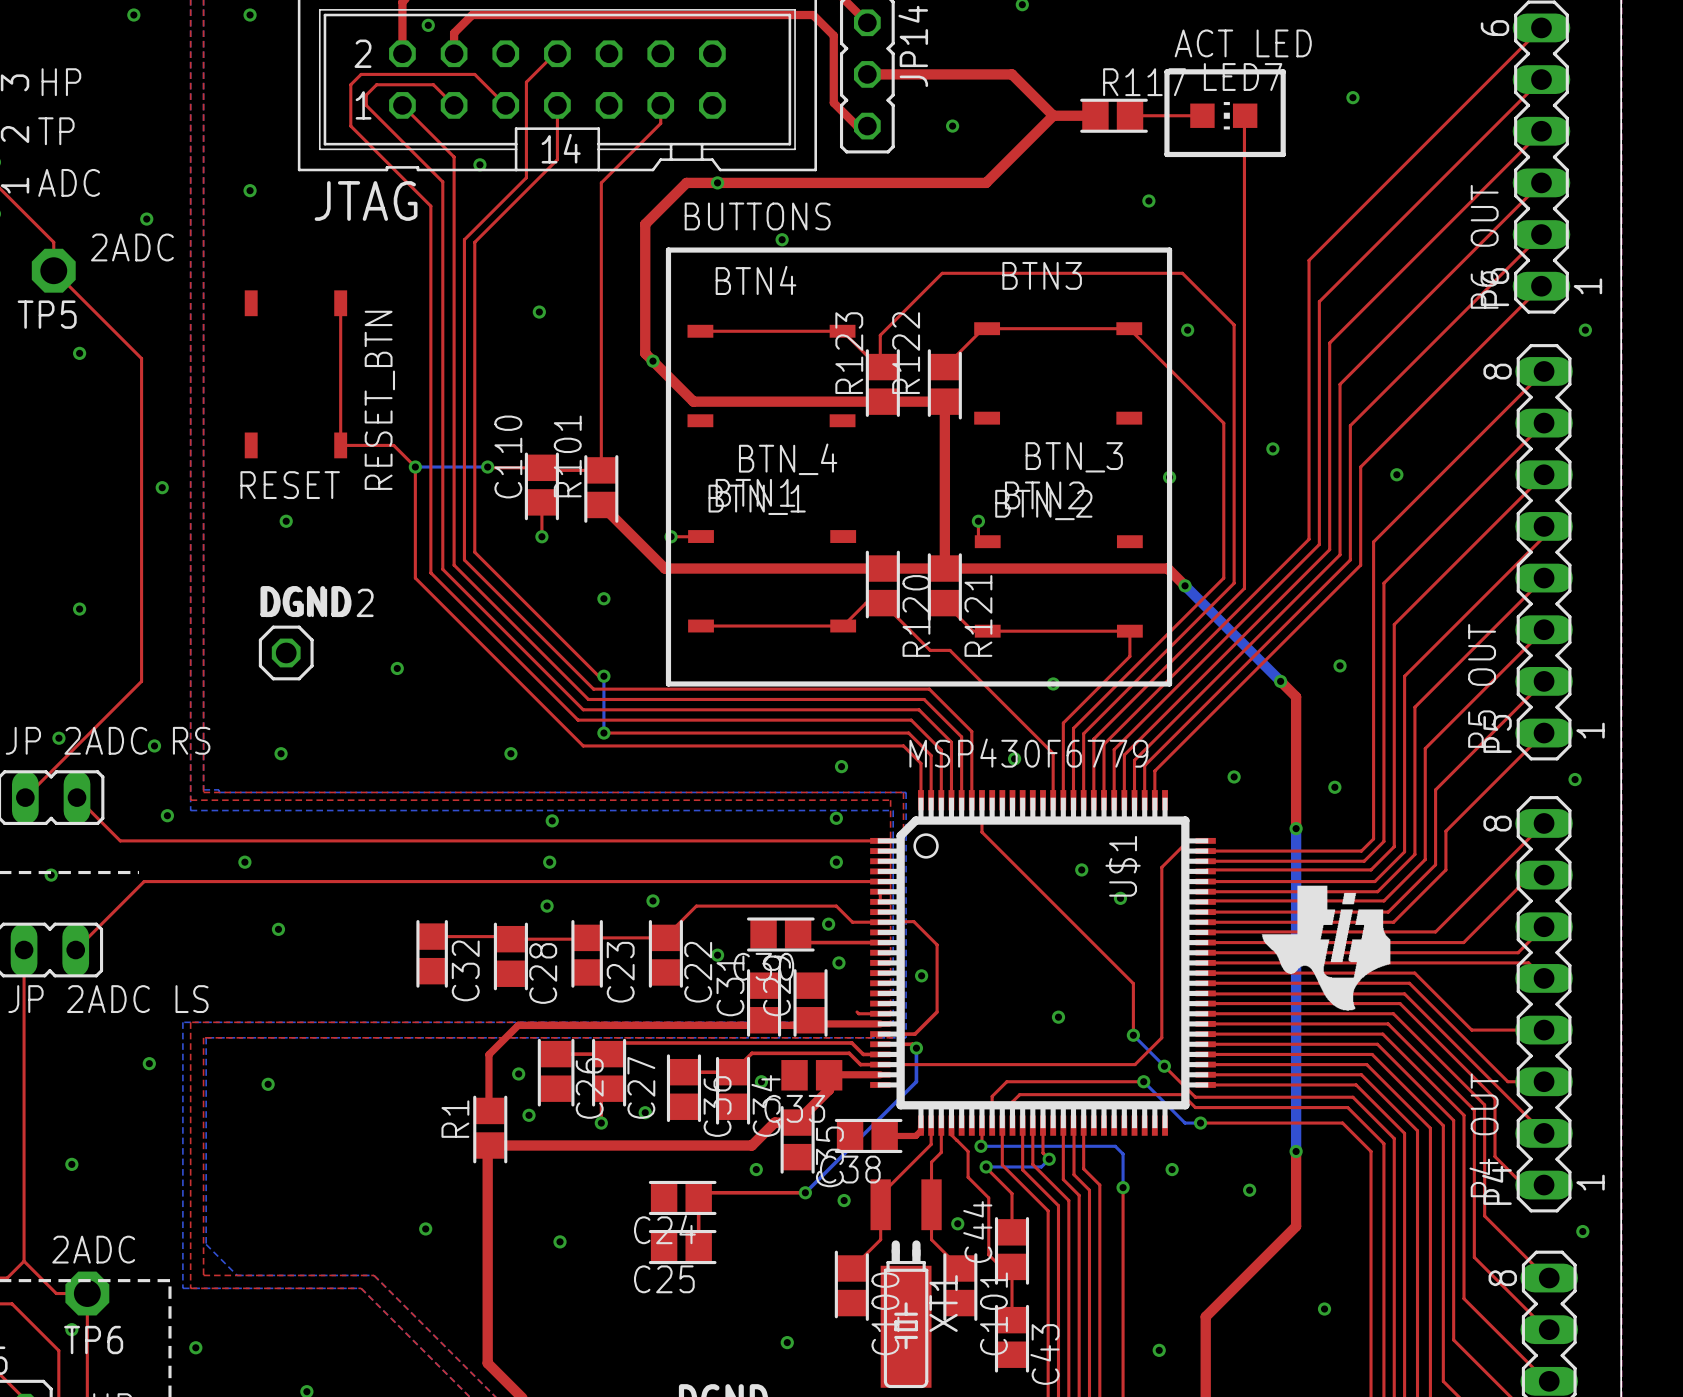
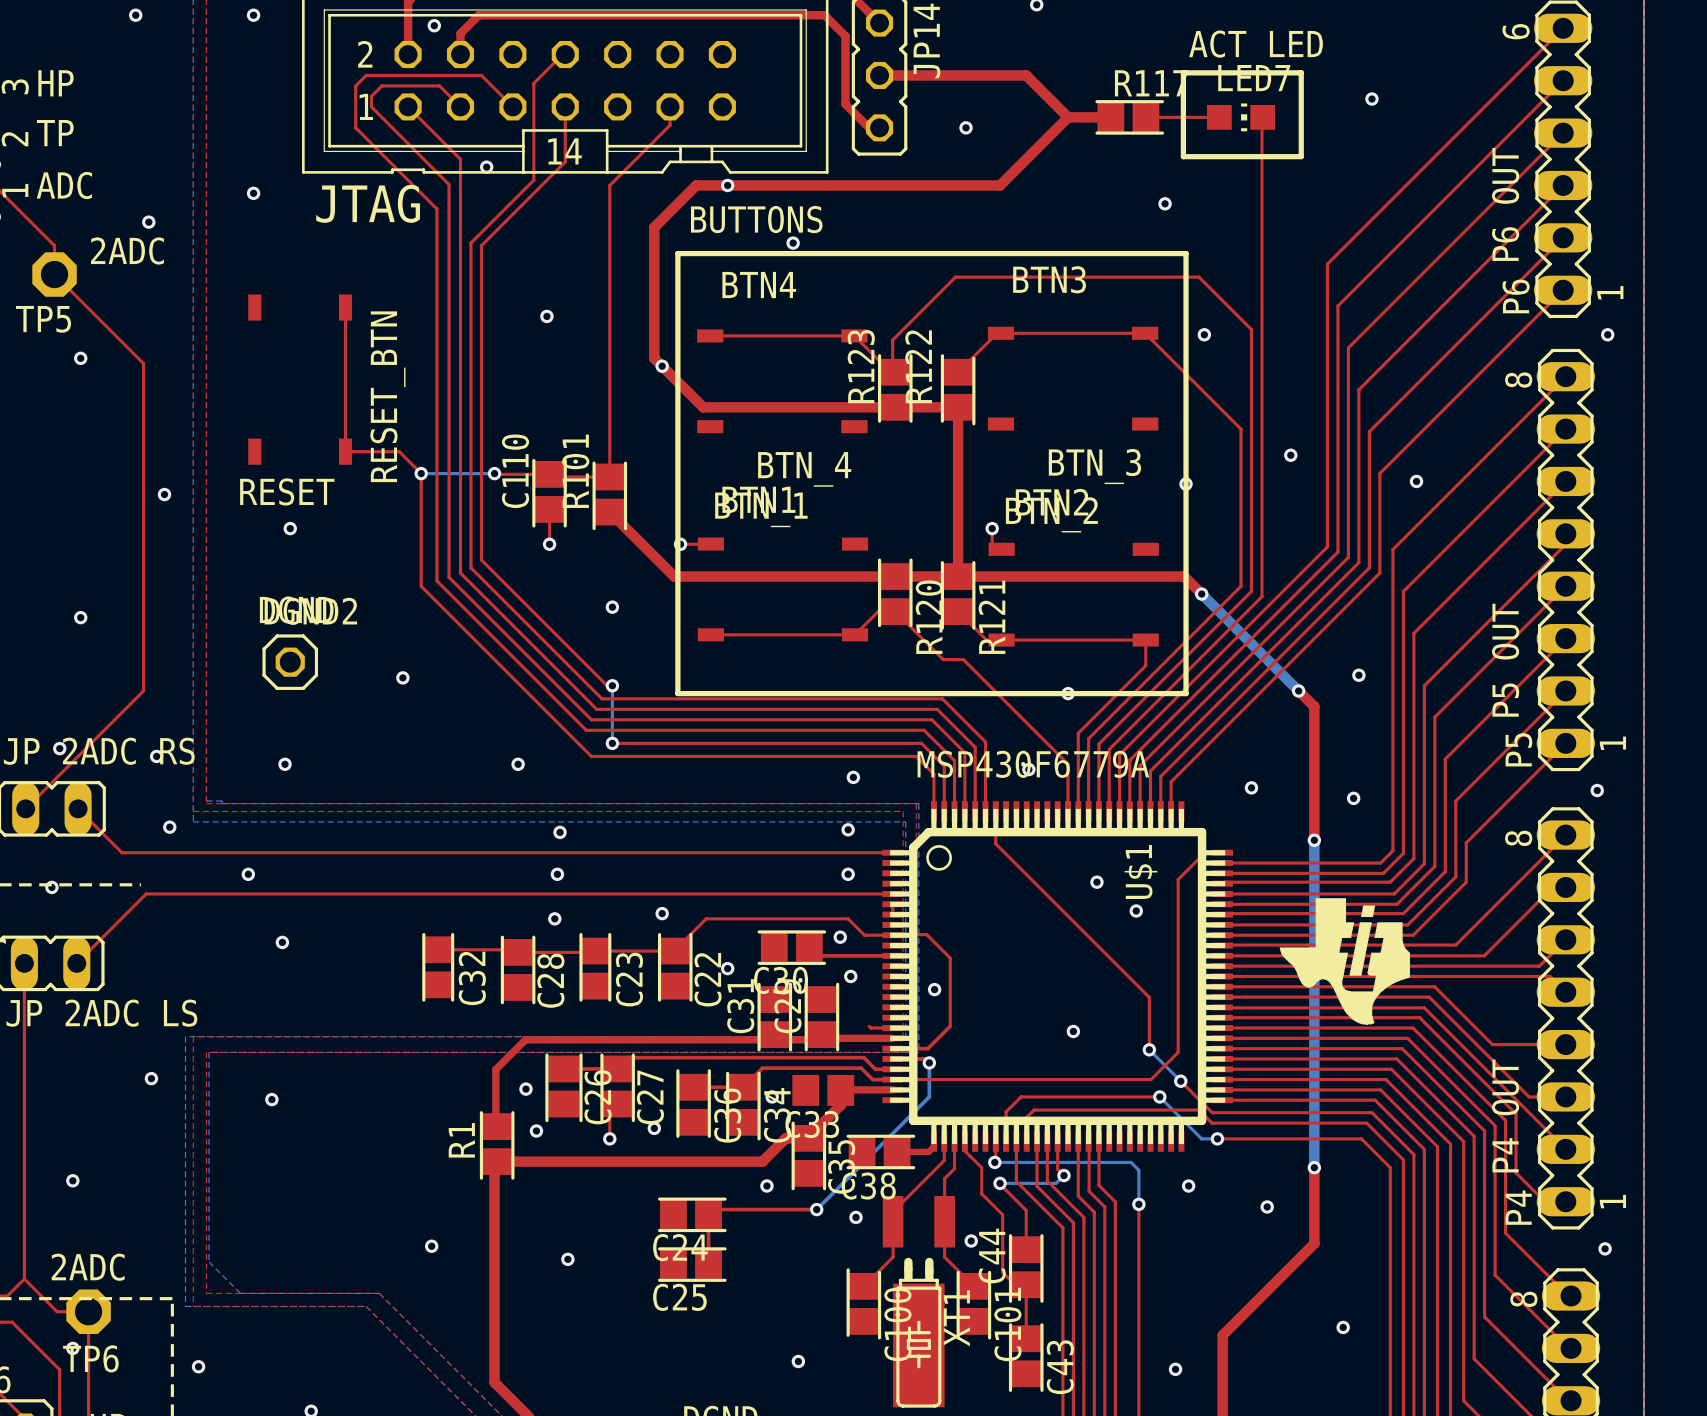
text position: P6 OUT (1484, 246) -> P6 OUT (1505, 204)
text position: P5 OUT (1482, 685) -> P5 OUT (1505, 660)
text: MSP430F6779 (1028, 753) -> MSP430F6779A (1033, 764)
text position: P4 OUT (1484, 1135) -> P4 OUT (1505, 1115)

